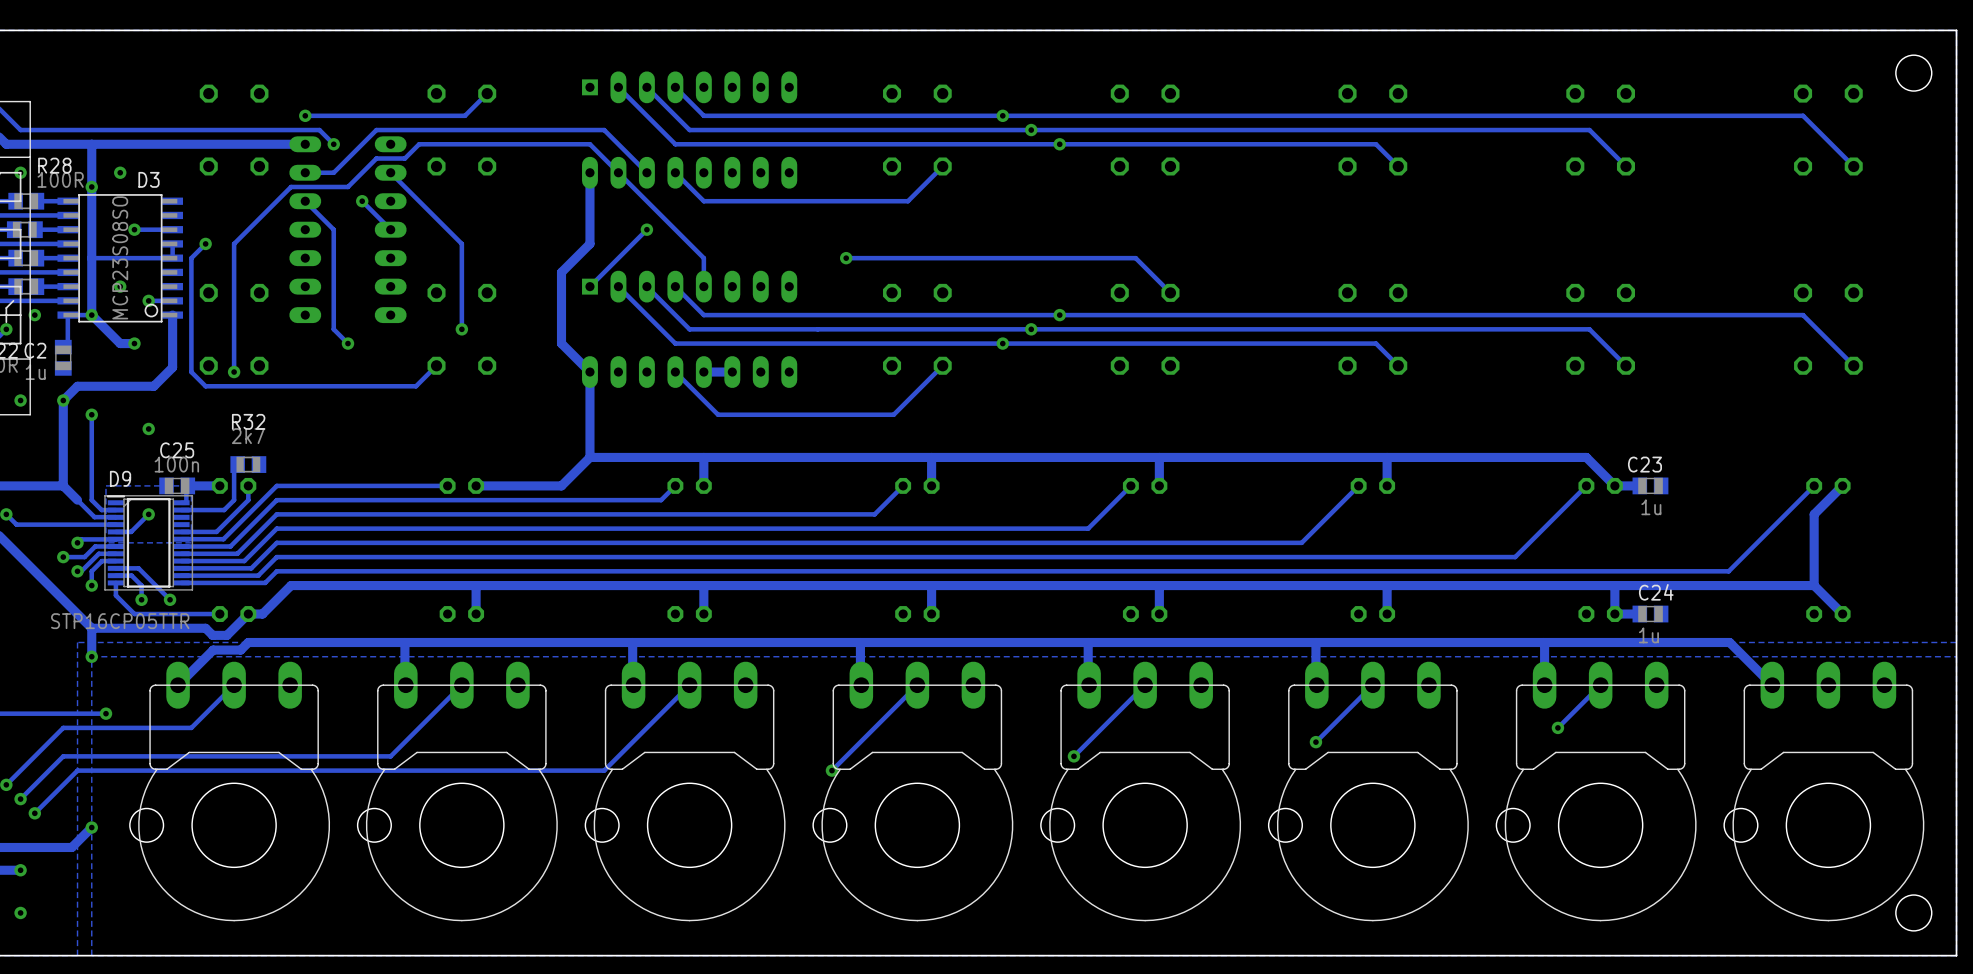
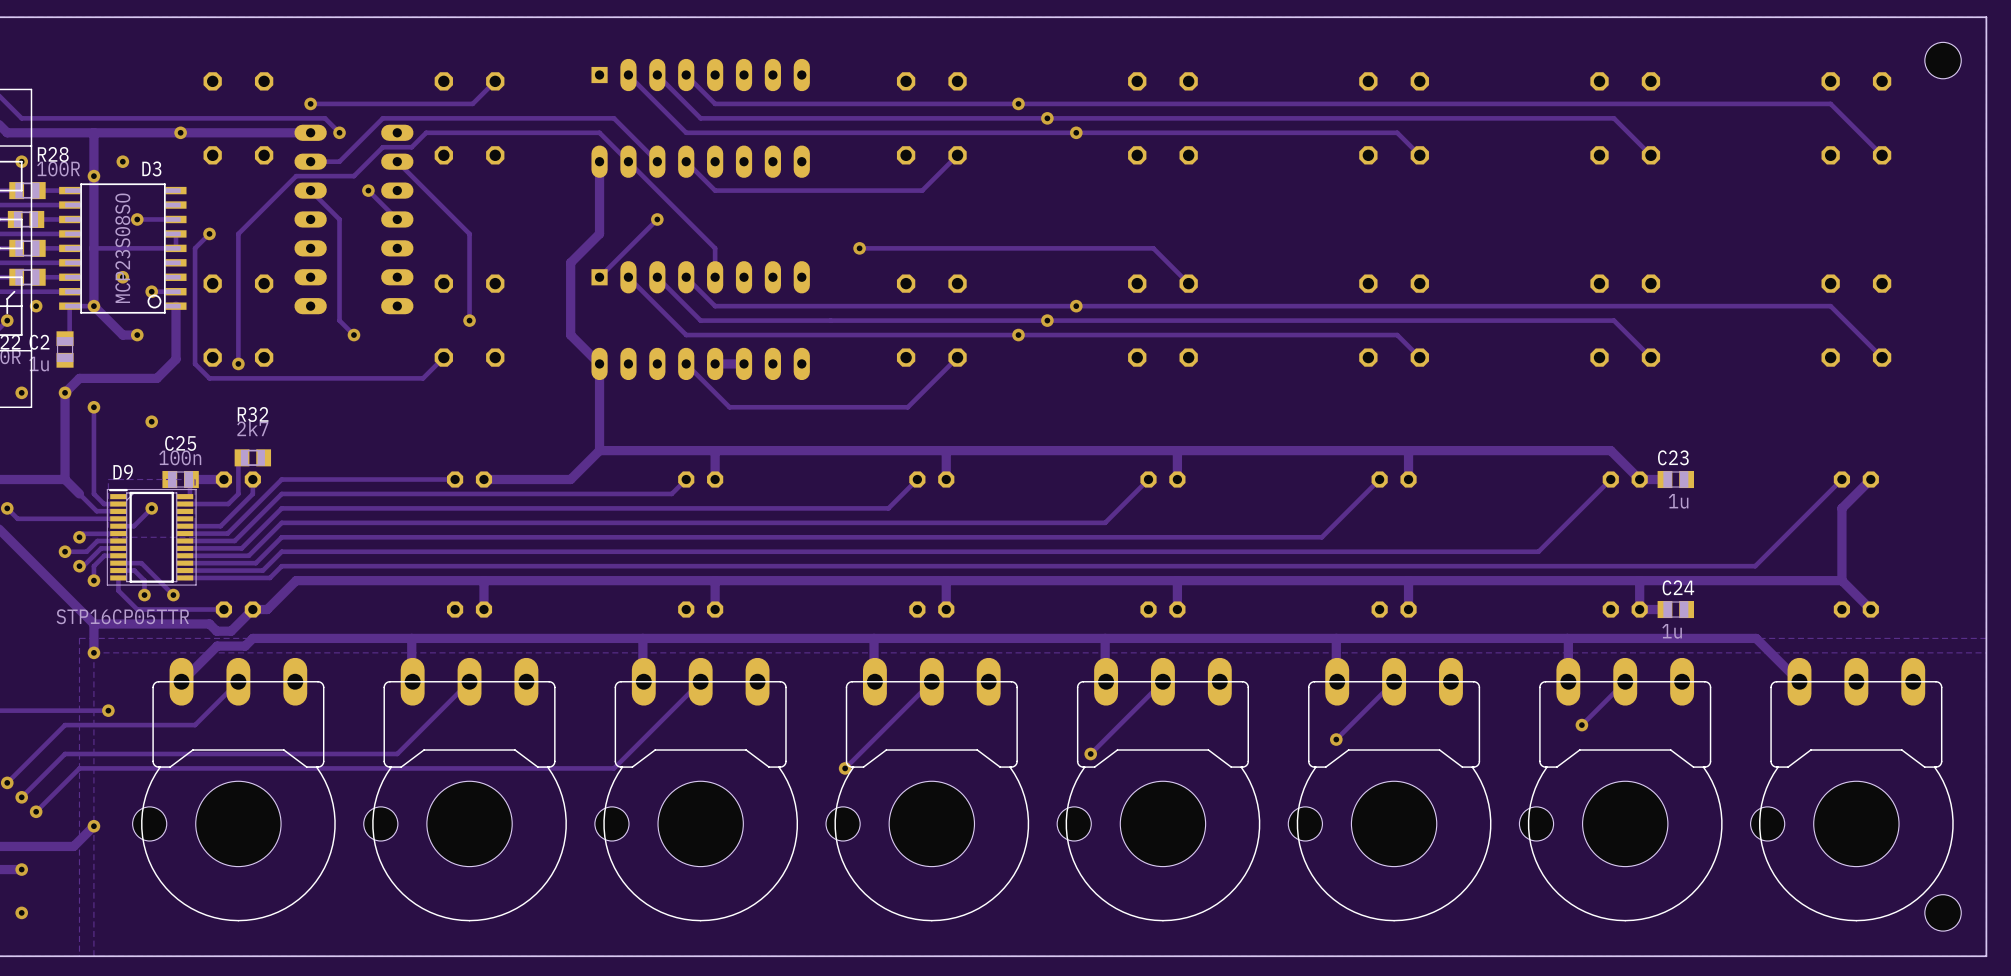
via: none -> (180, 132)

